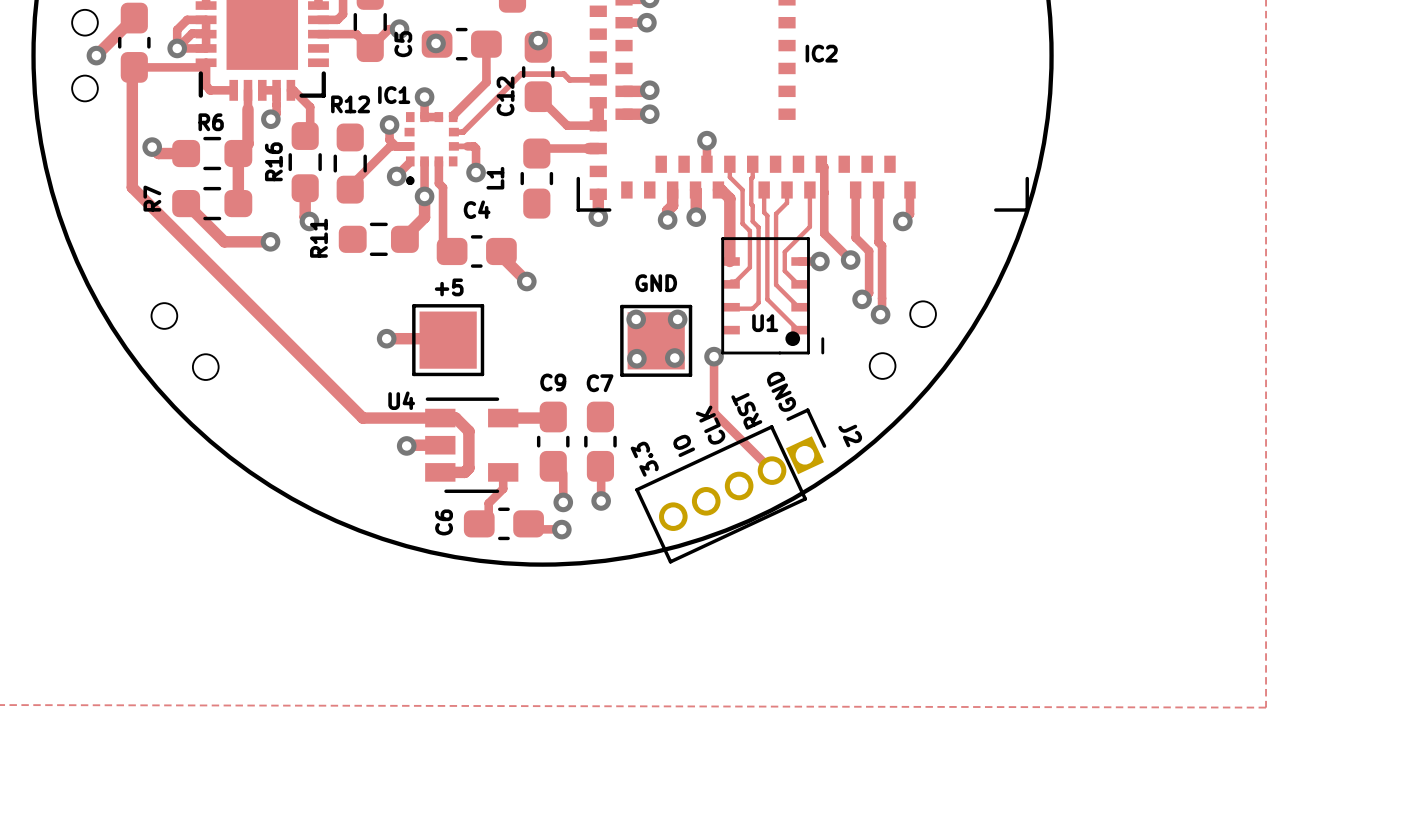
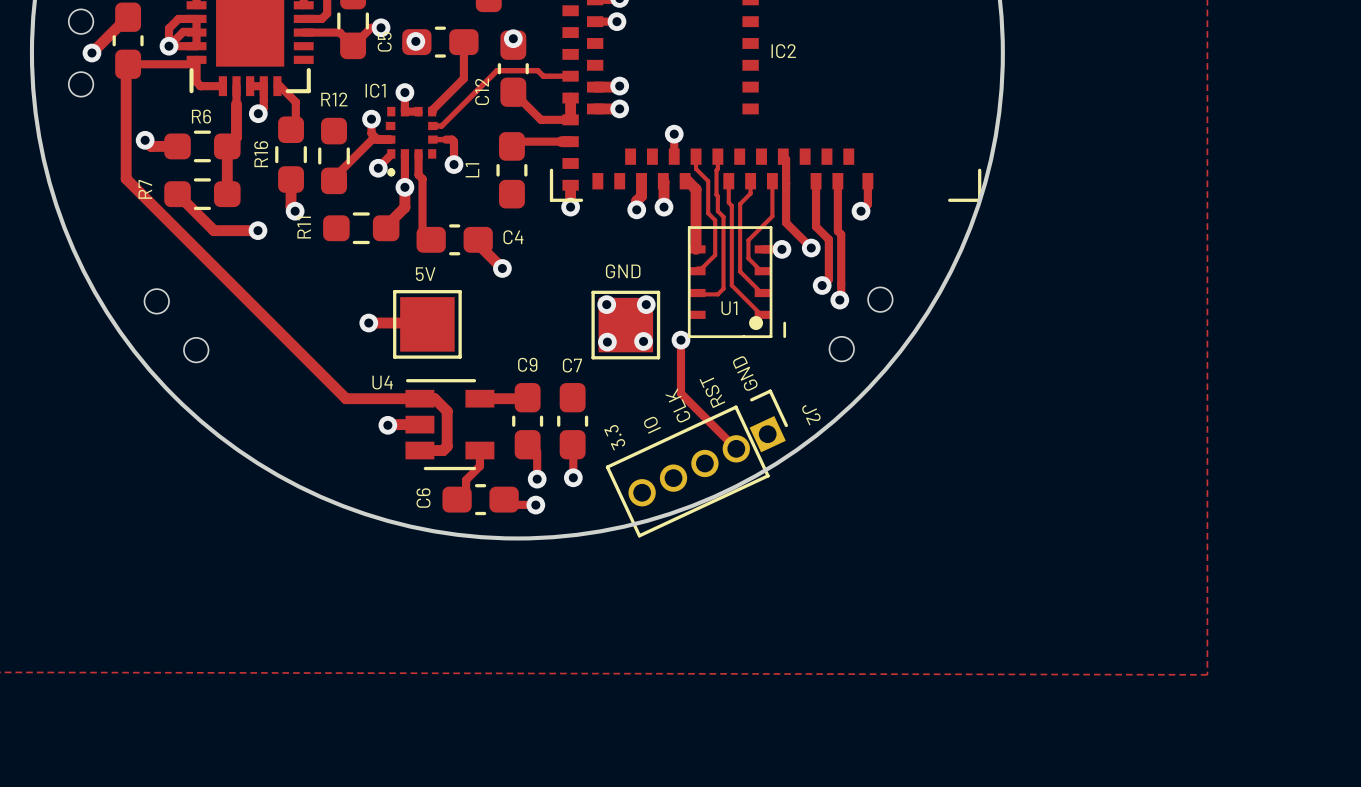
C4 name position: C4 (477, 209) -> C4 (513, 237)
GND name: GND (656, 283) -> none
text: none -> GND (623, 271)
text: none -> 5V (425, 274)
+5 name: +5 (449, 287) -> none

